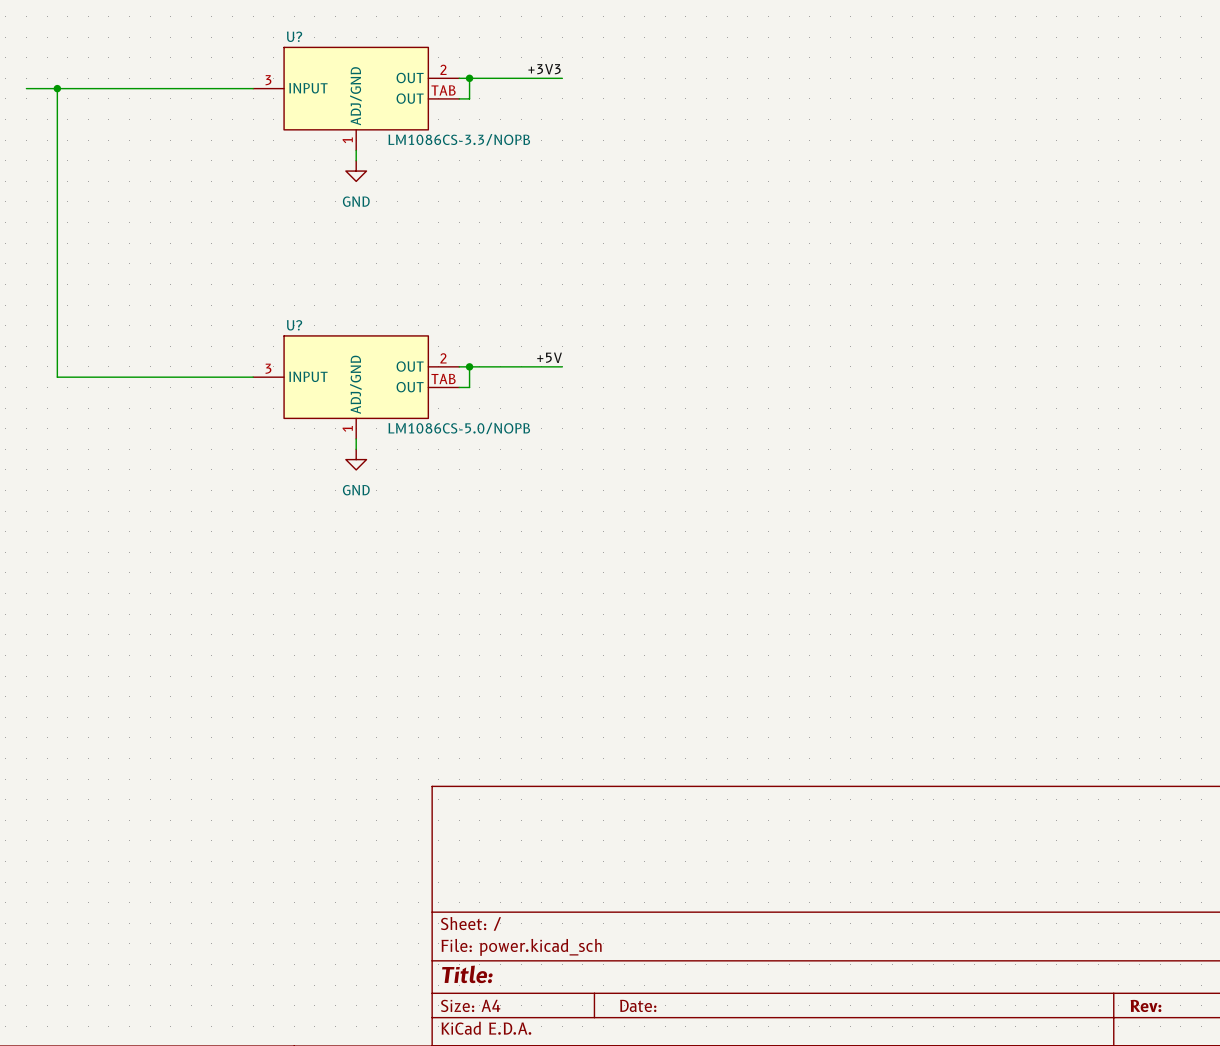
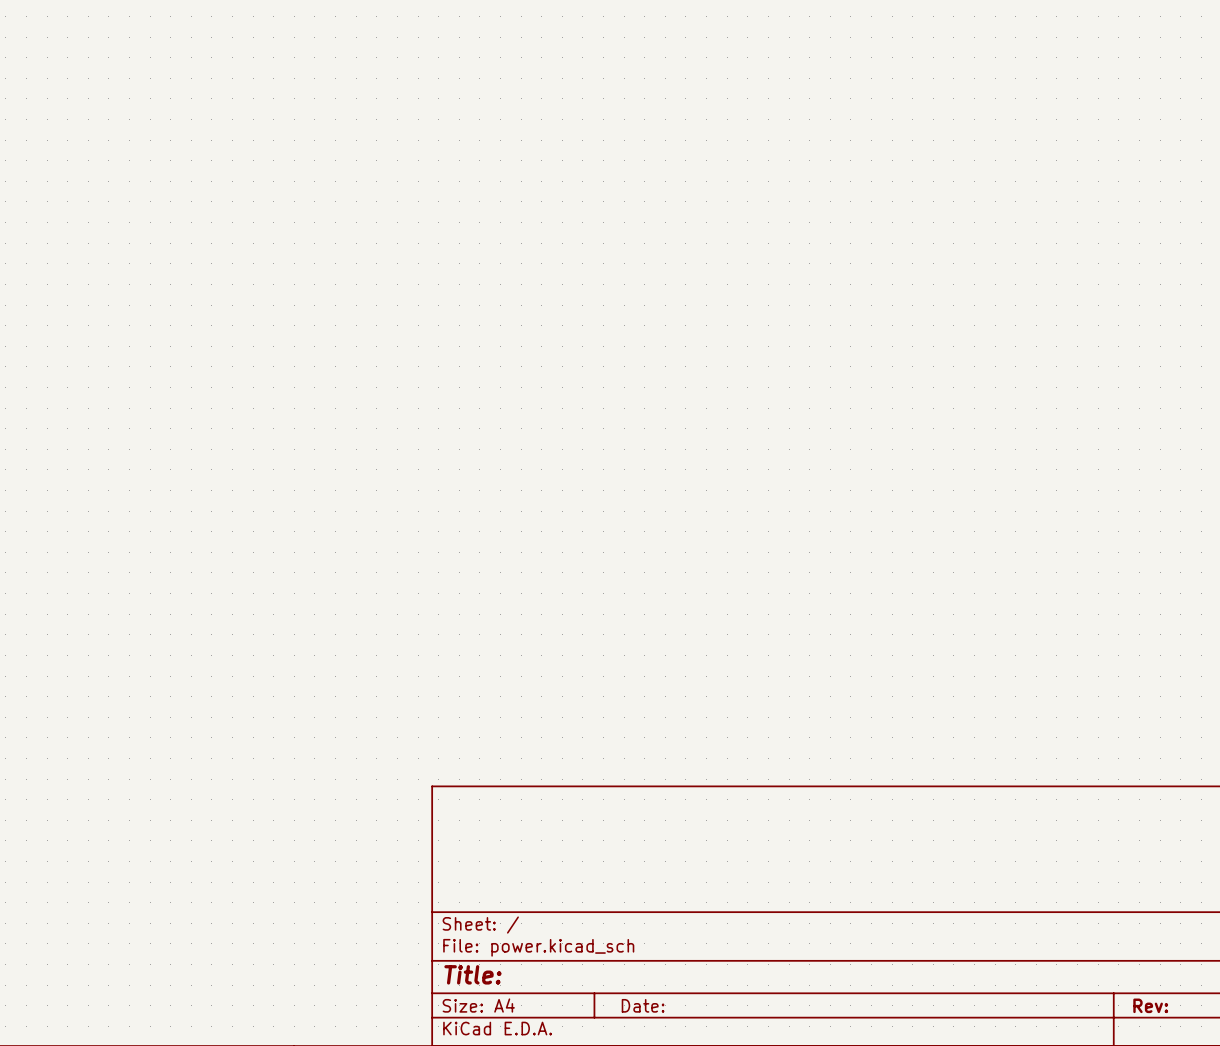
label: +3V3 (544, 69) -> none
wire: (459, 78) (562, 78) -> none
wire: (469, 78) (469, 98) (459, 98) -> none
junction: (469, 78) -> none
wire: (26, 88) (253, 88) -> none
wire: (57, 88) (57, 377) (253, 377) -> none
junction: (57, 88) -> none
U?: LM1086CS-3.3/NOPB (356, 98) -> none
wire: (356, 150) (356, 160) -> none
power symbol: GND (356, 171) -> none
label: +5V (549, 357) -> none
wire: (459, 366) (562, 366) -> none
wire: (469, 366) (469, 387) (459, 387) -> none
junction: (469, 366) -> none
U?: LM1086CS-5.0/NOPB (356, 387) -> none
wire: (356, 439) (356, 449) -> none
power symbol: GND (356, 459) -> none

